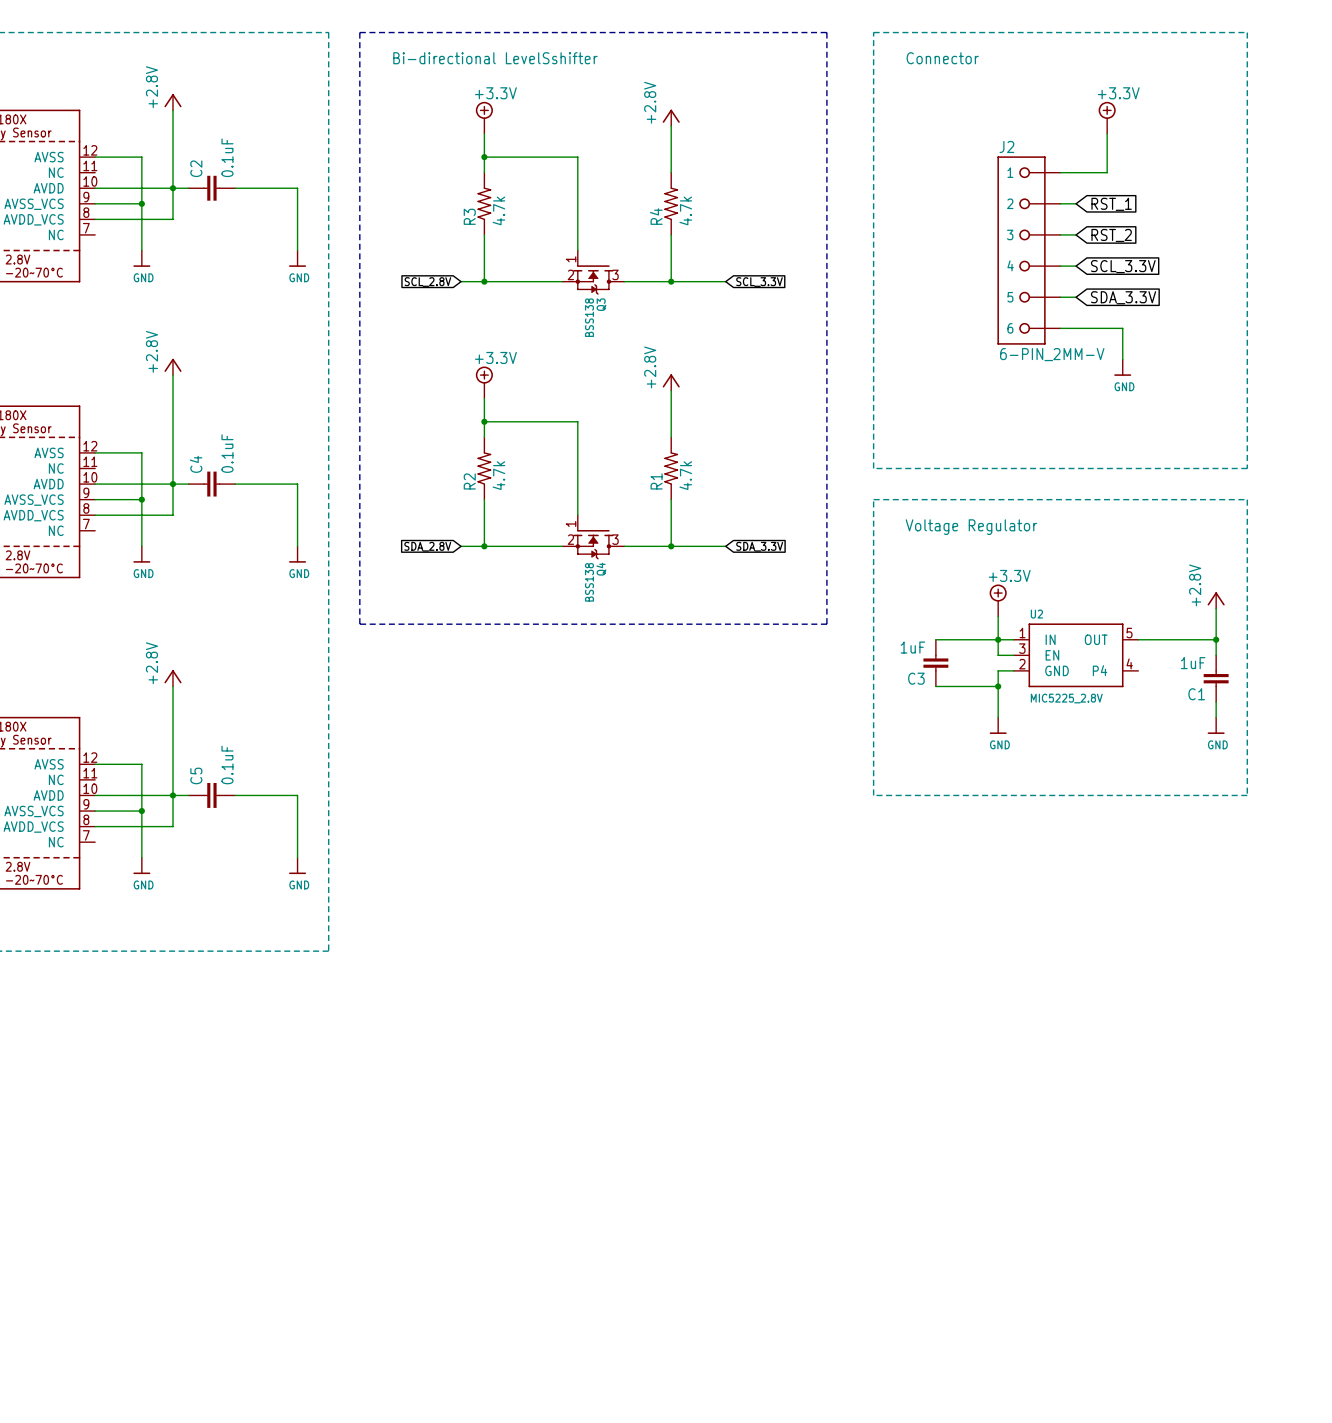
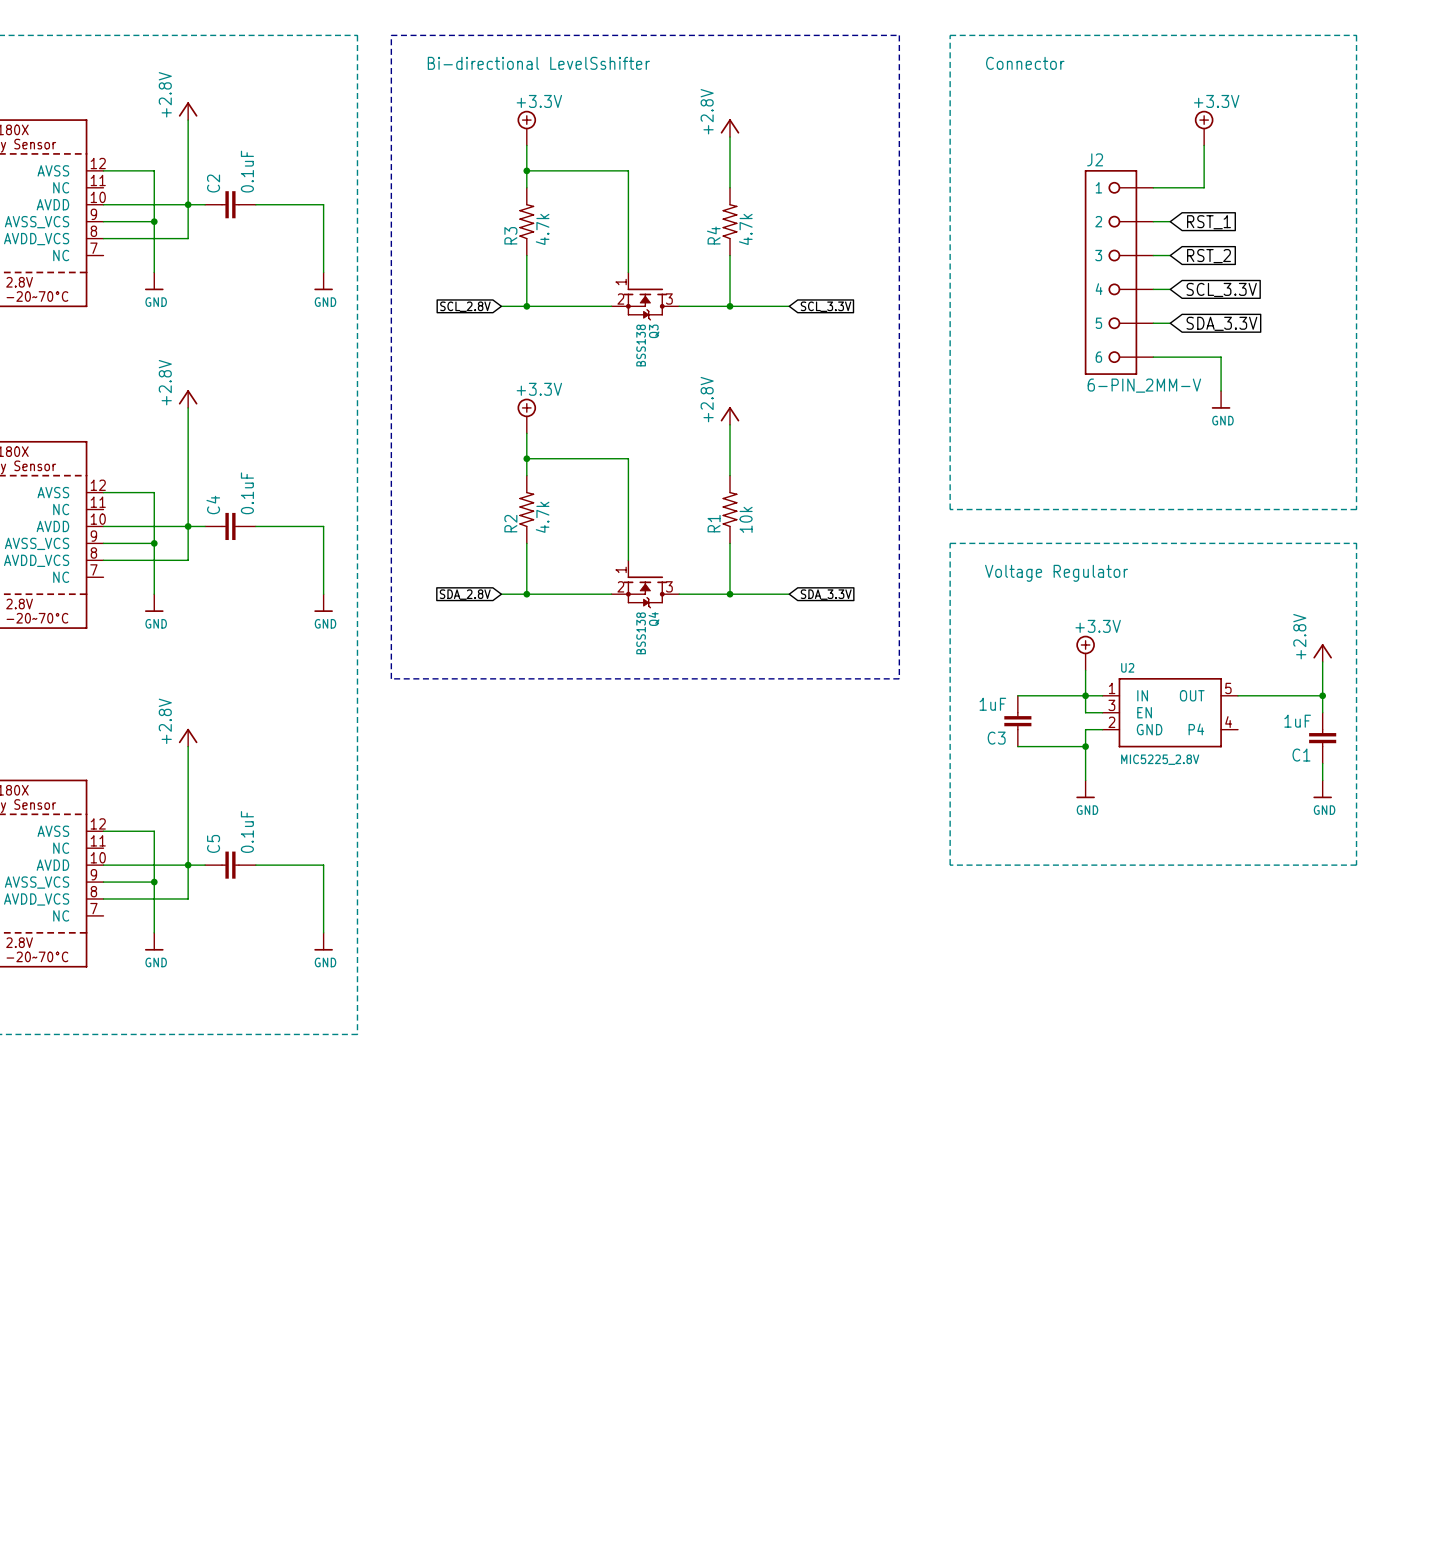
R1 value: 4.7k (685, 475) -> 10k (746, 519)

